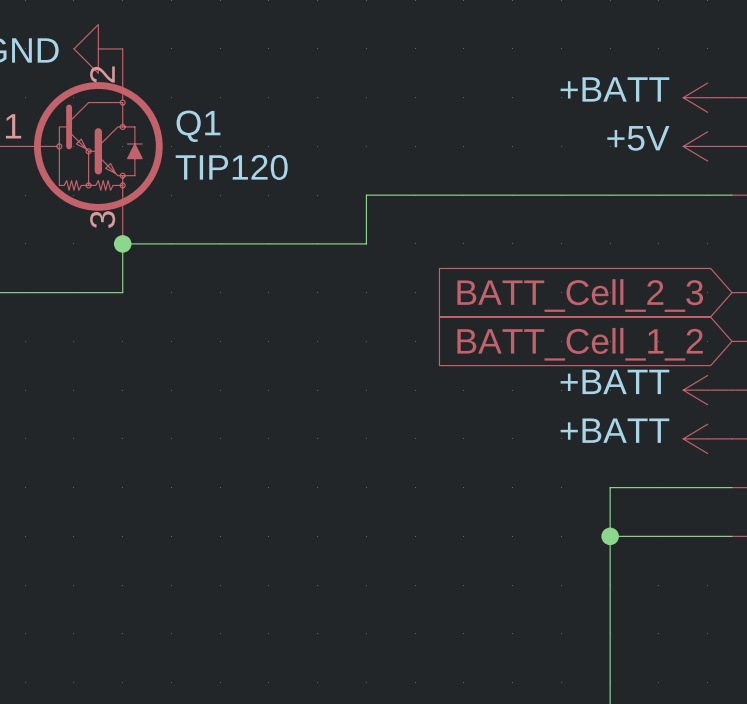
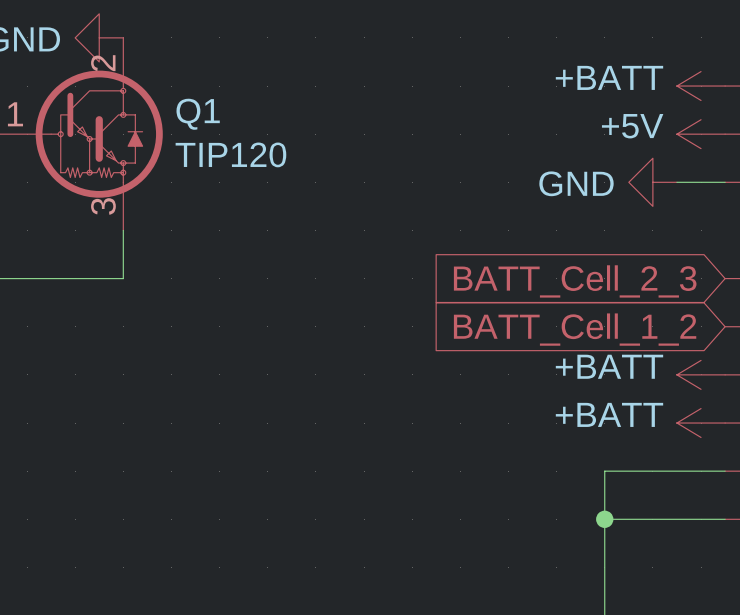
power symbol: none -> GND (652, 182)
wire: (683, 195) (366, 195) (366, 243) (122, 243) -> none
junction: (122, 243) -> none

